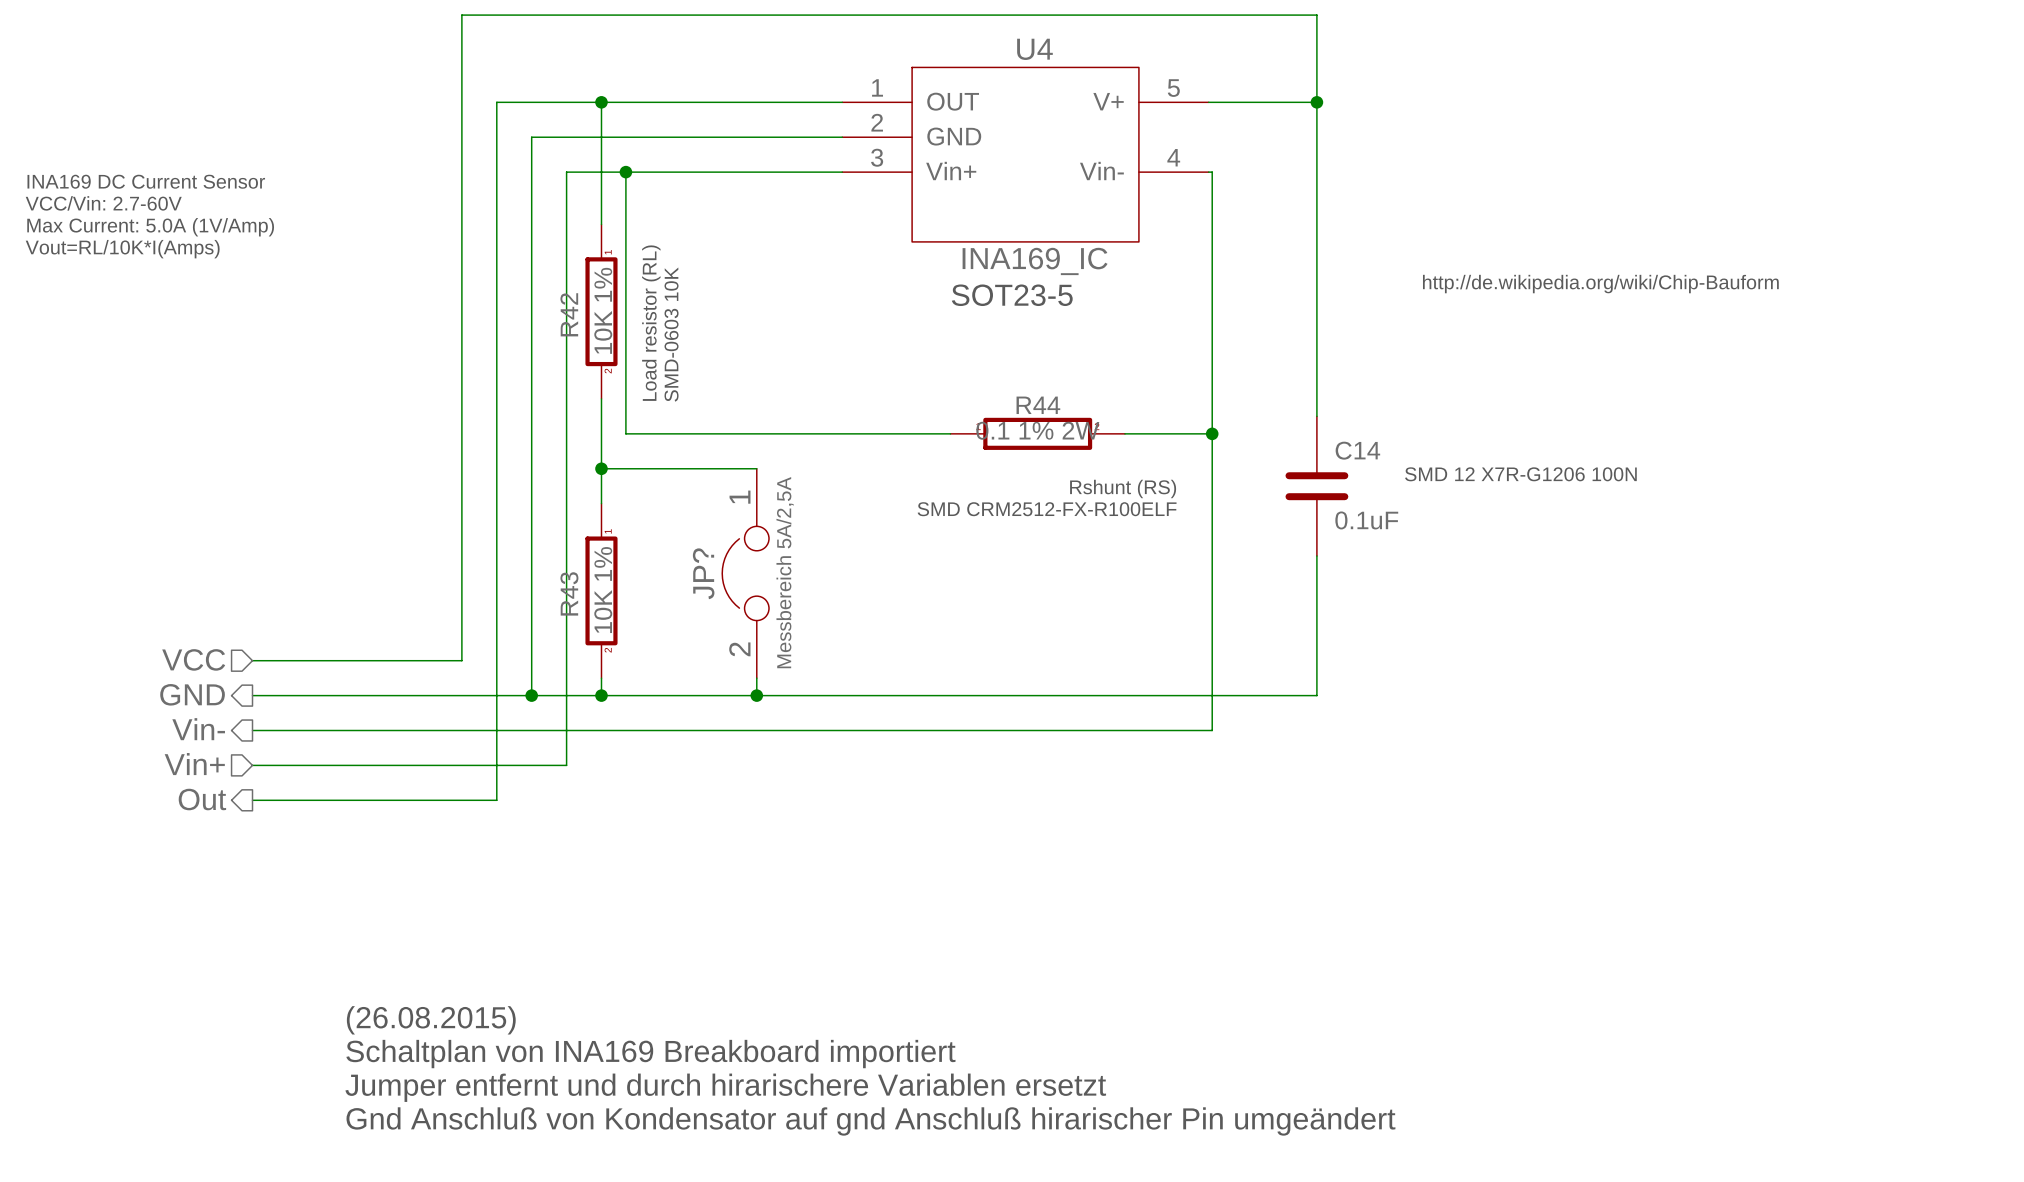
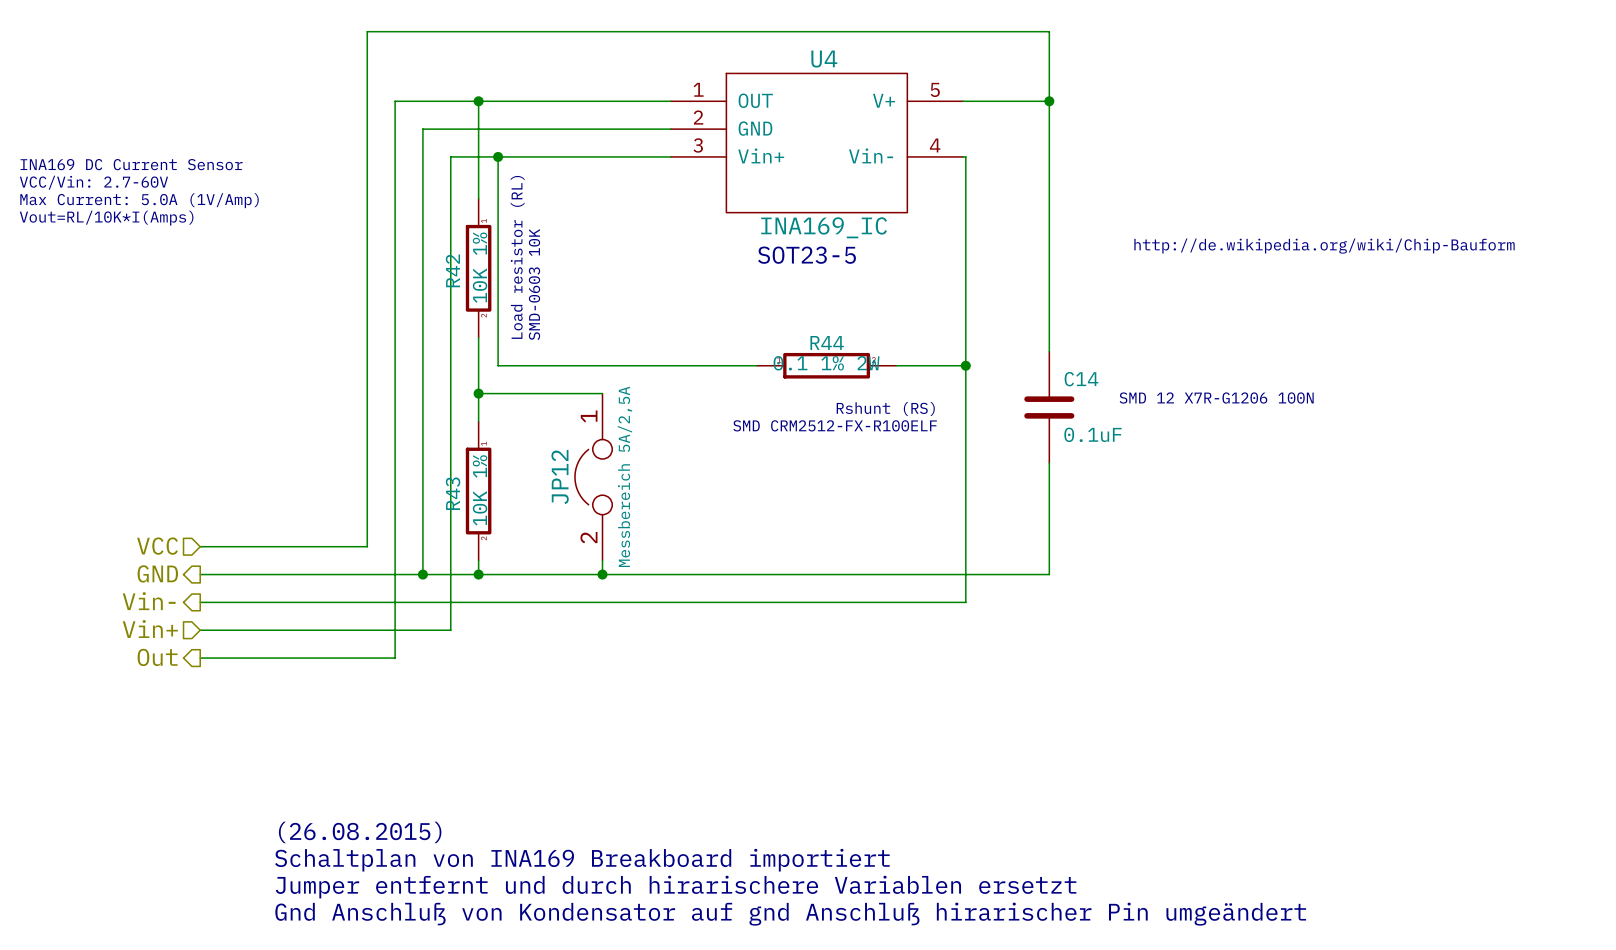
JP? name: JP? (703, 573) -> JP12 (560, 476)

